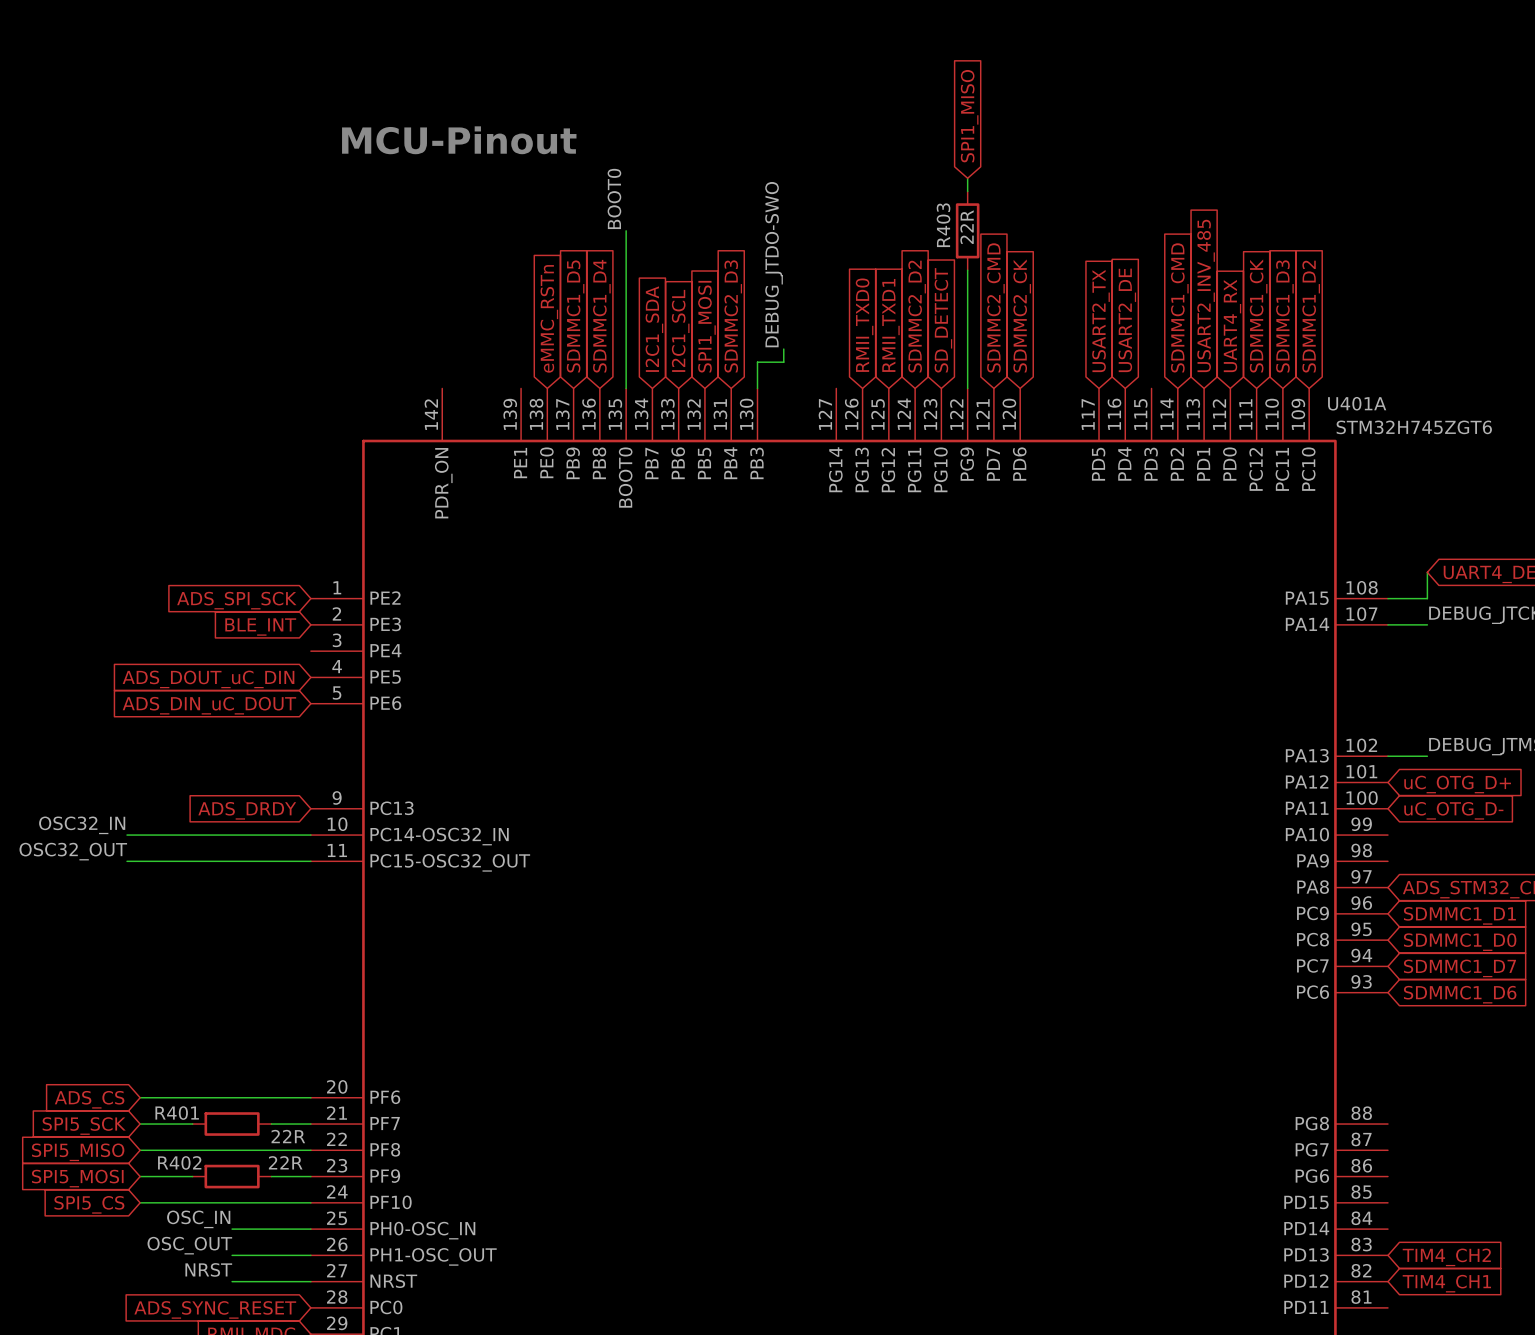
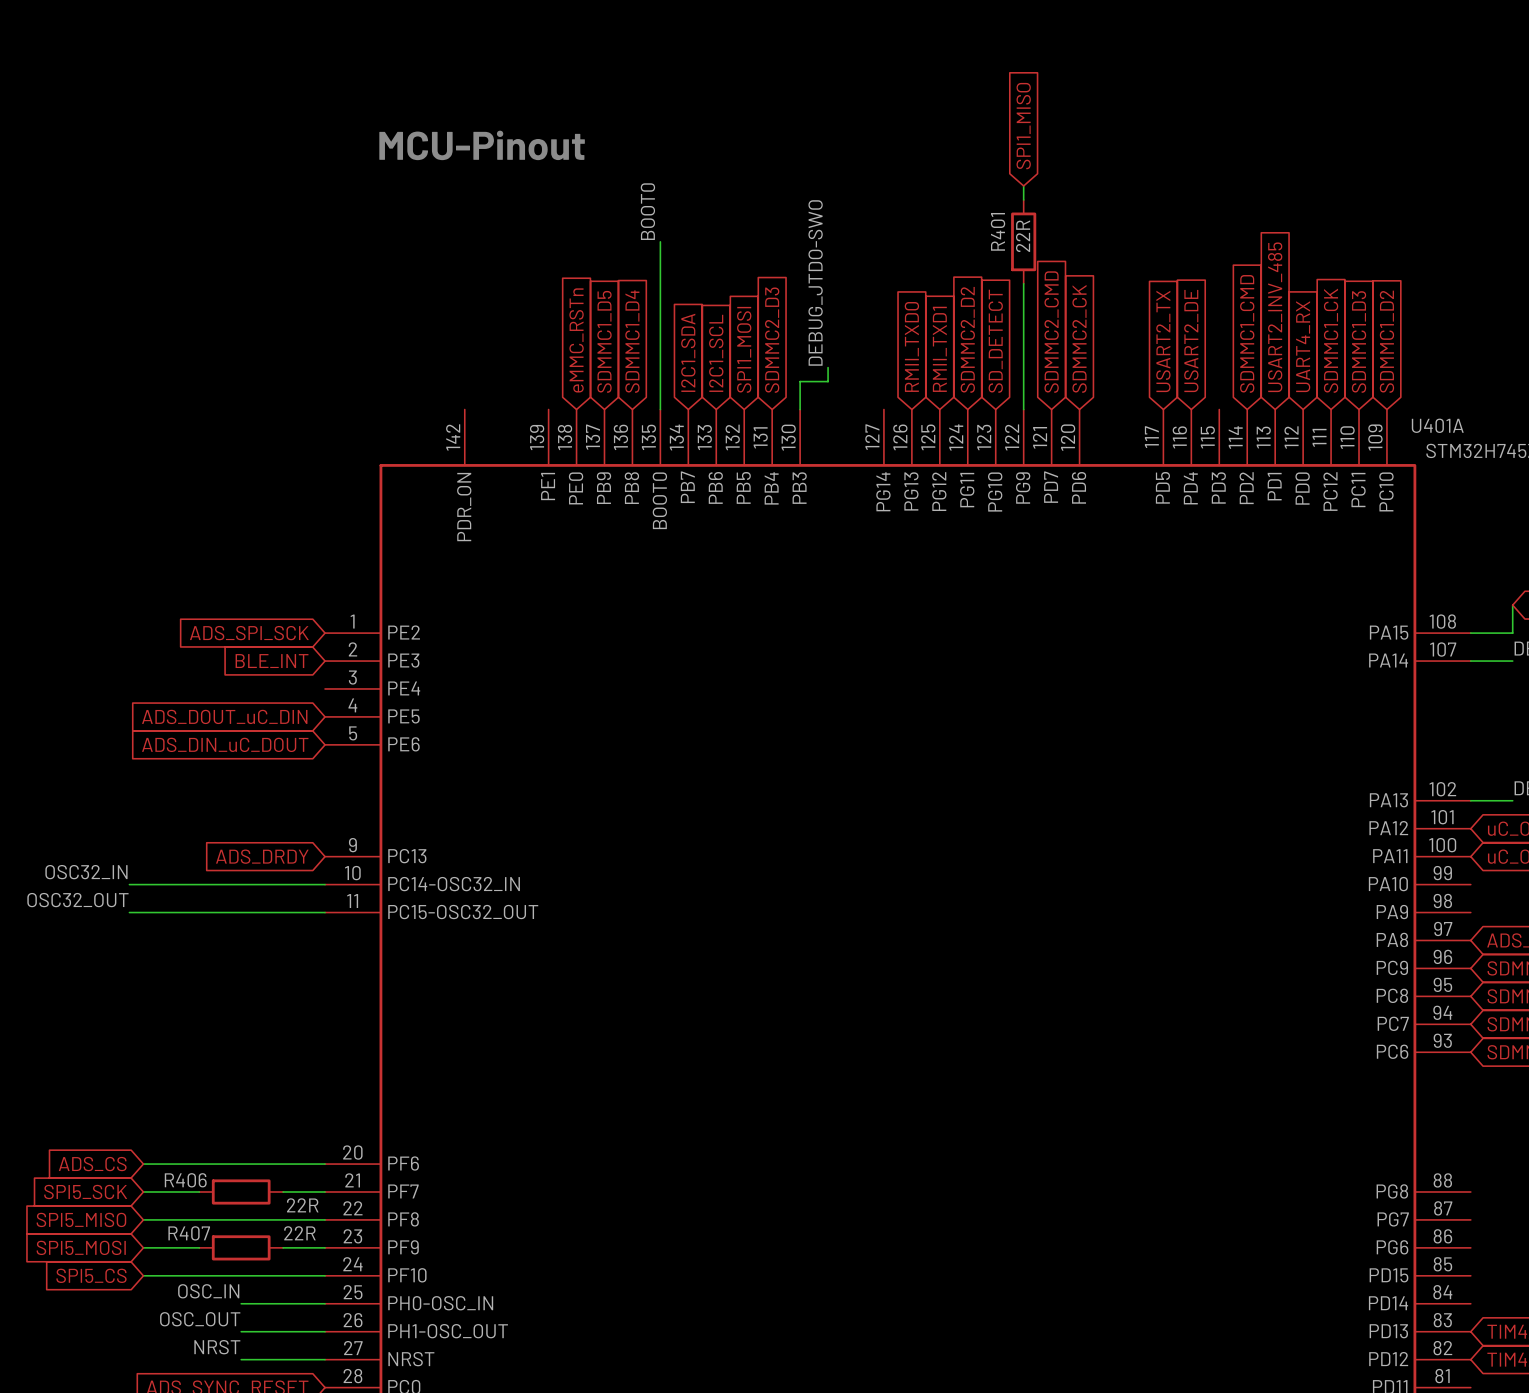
R403 name: R403 (943, 225) -> R401 (998, 231)
R401 name: R401 (177, 1113) -> R406 (185, 1180)
R402 name: R402 (179, 1162) -> R407 (189, 1233)

